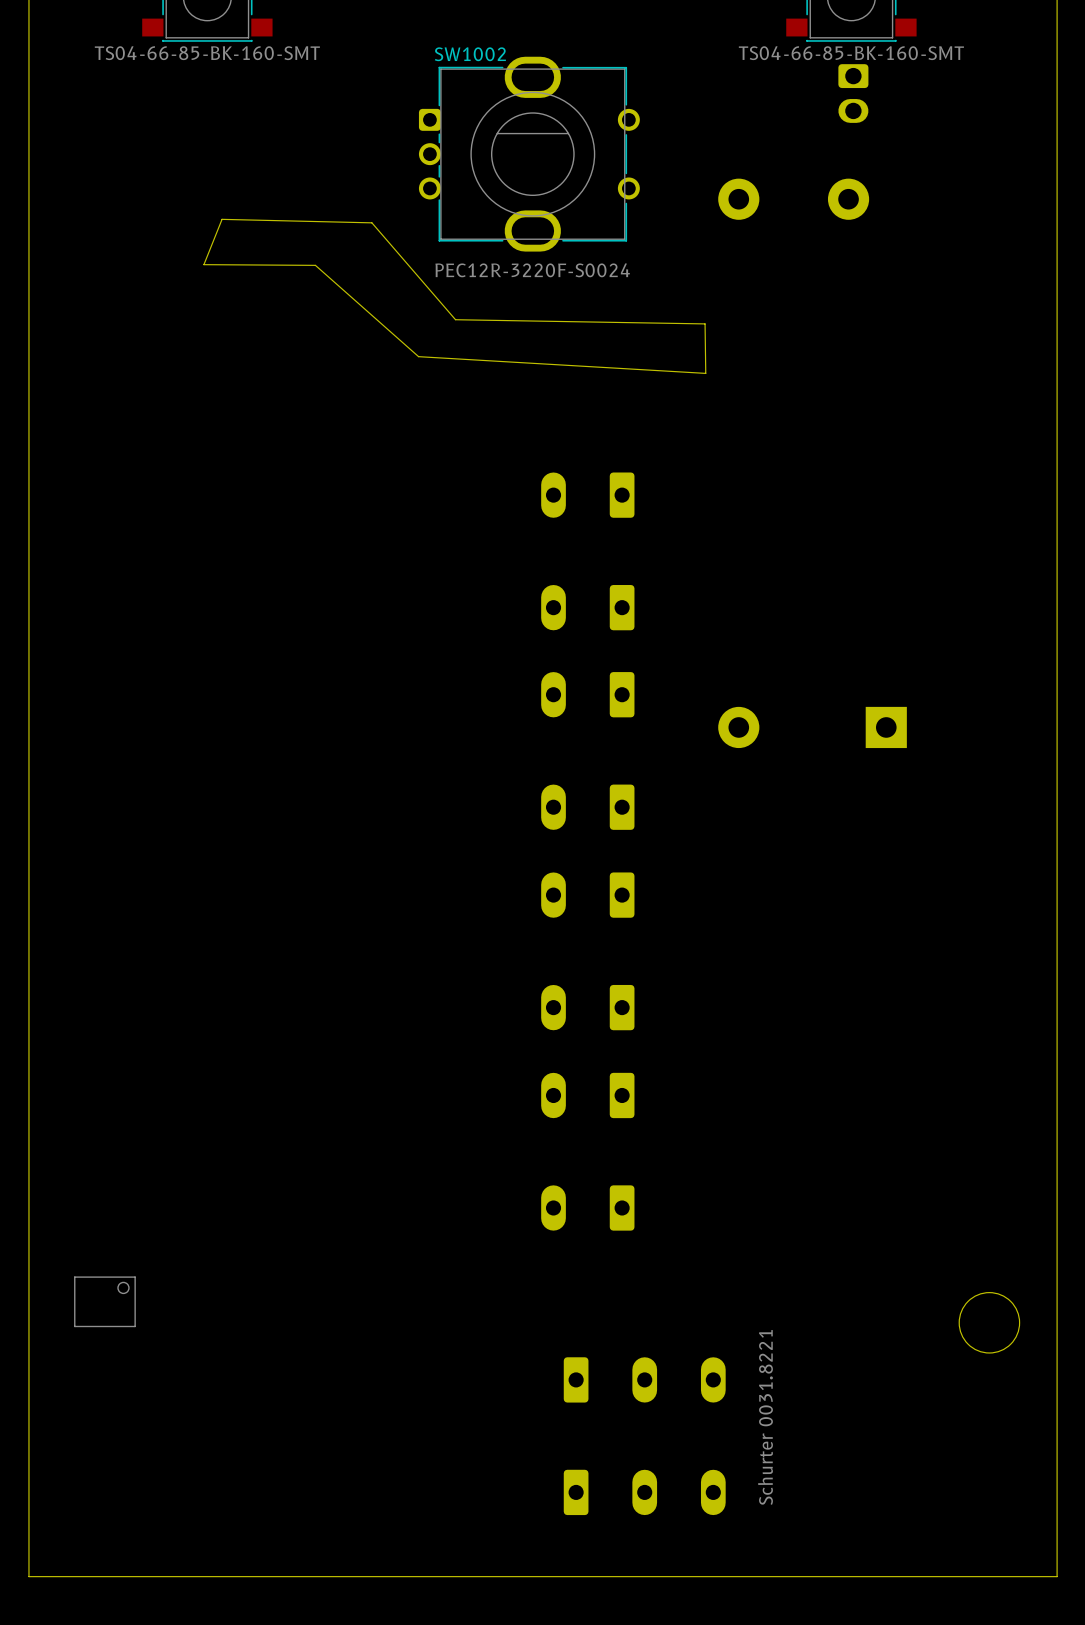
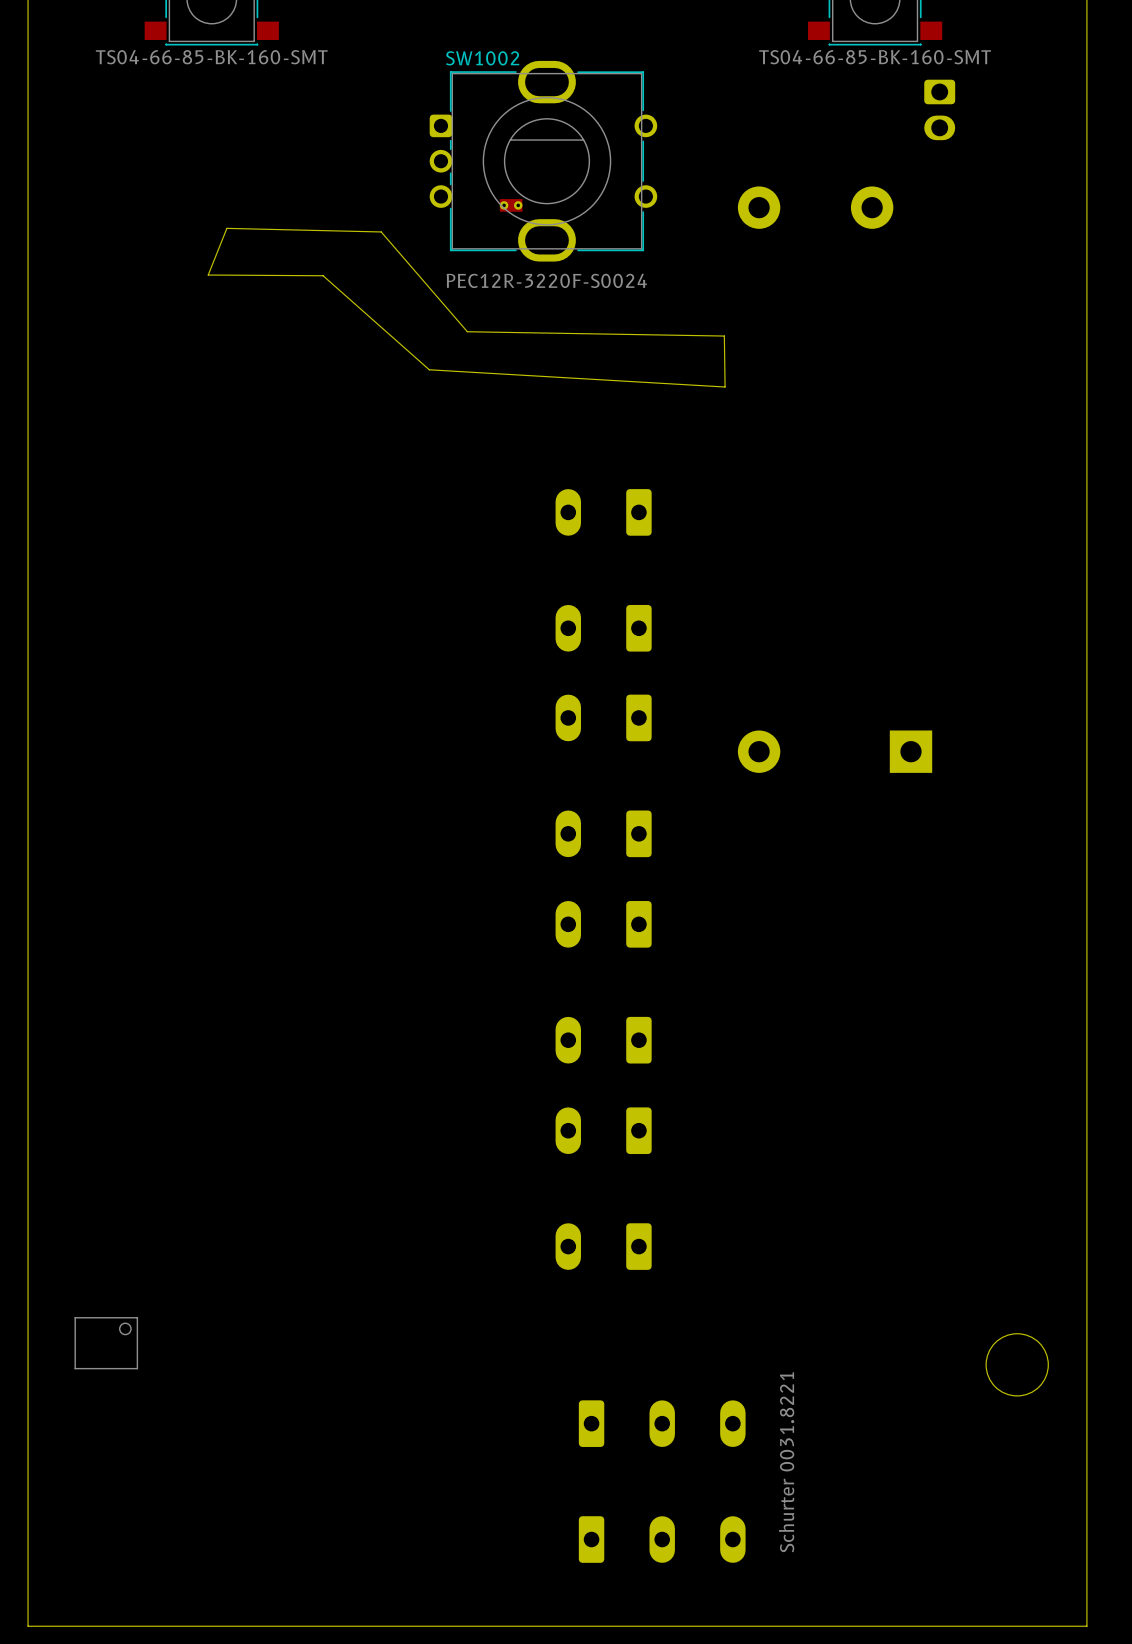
part position: (853, 93) -> (939, 109)
part: none -> (511, 205)

